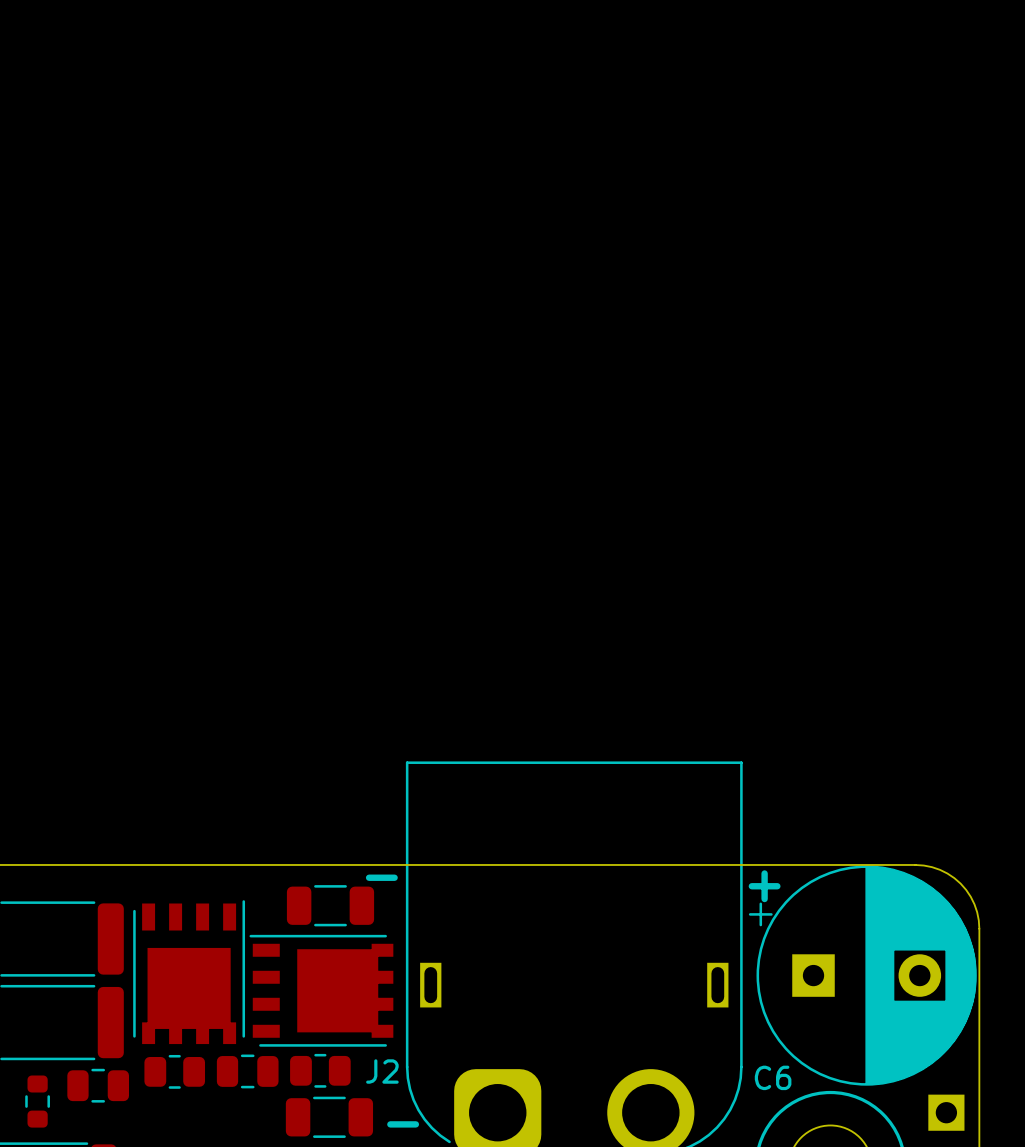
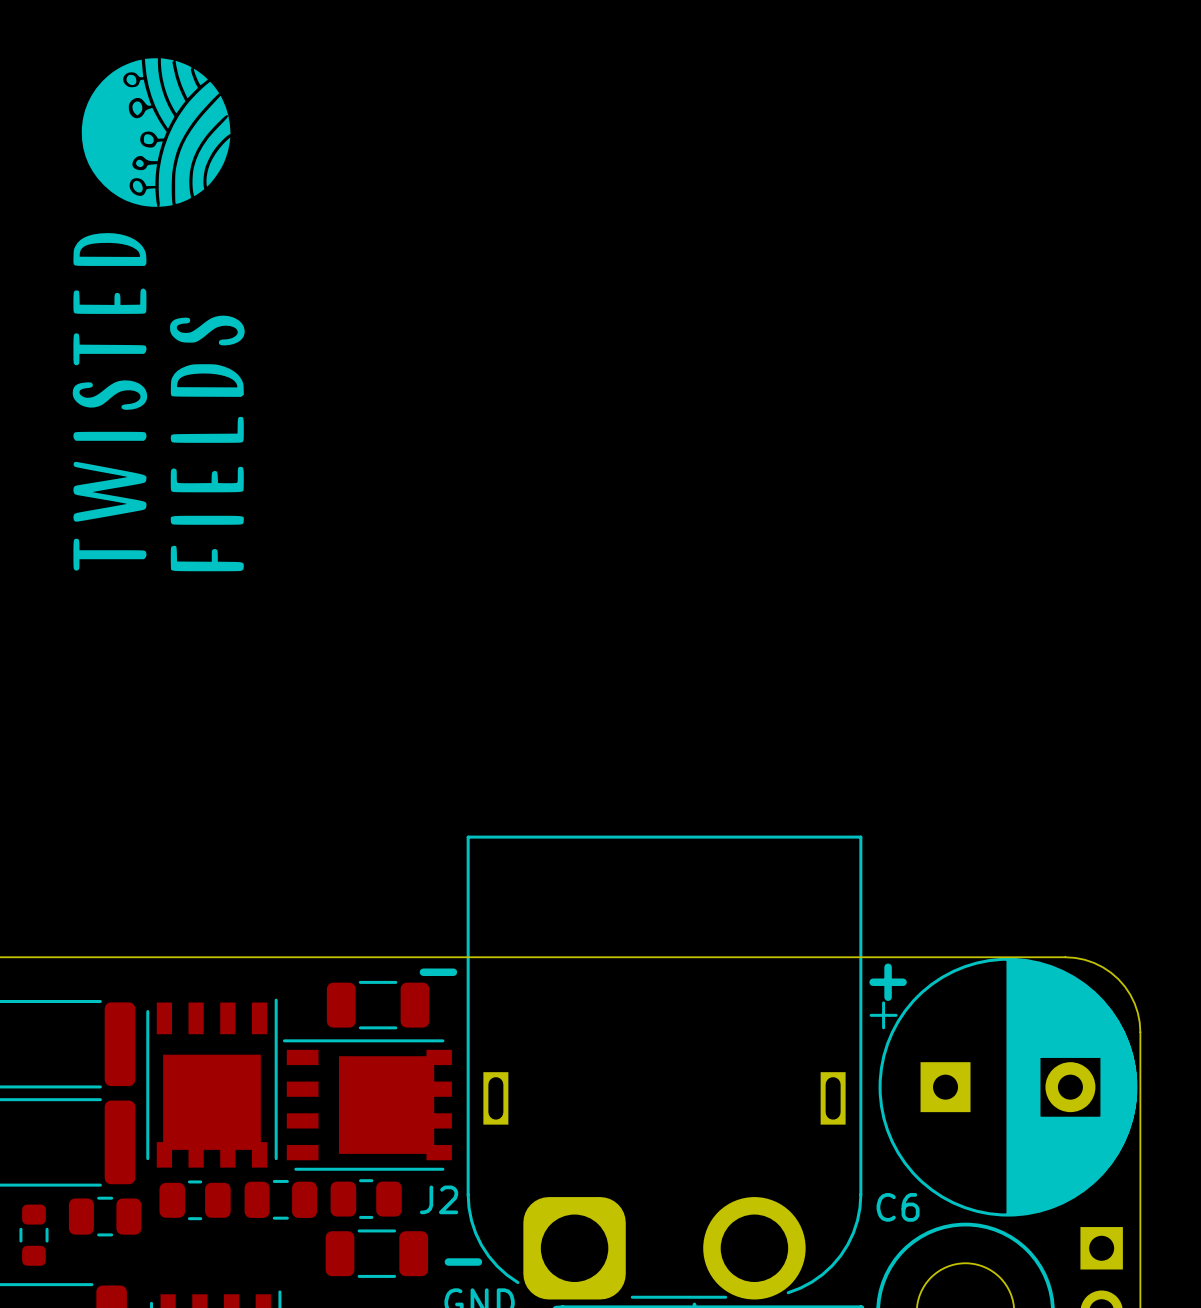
drawing: none -> [72, 58, 245, 572]

